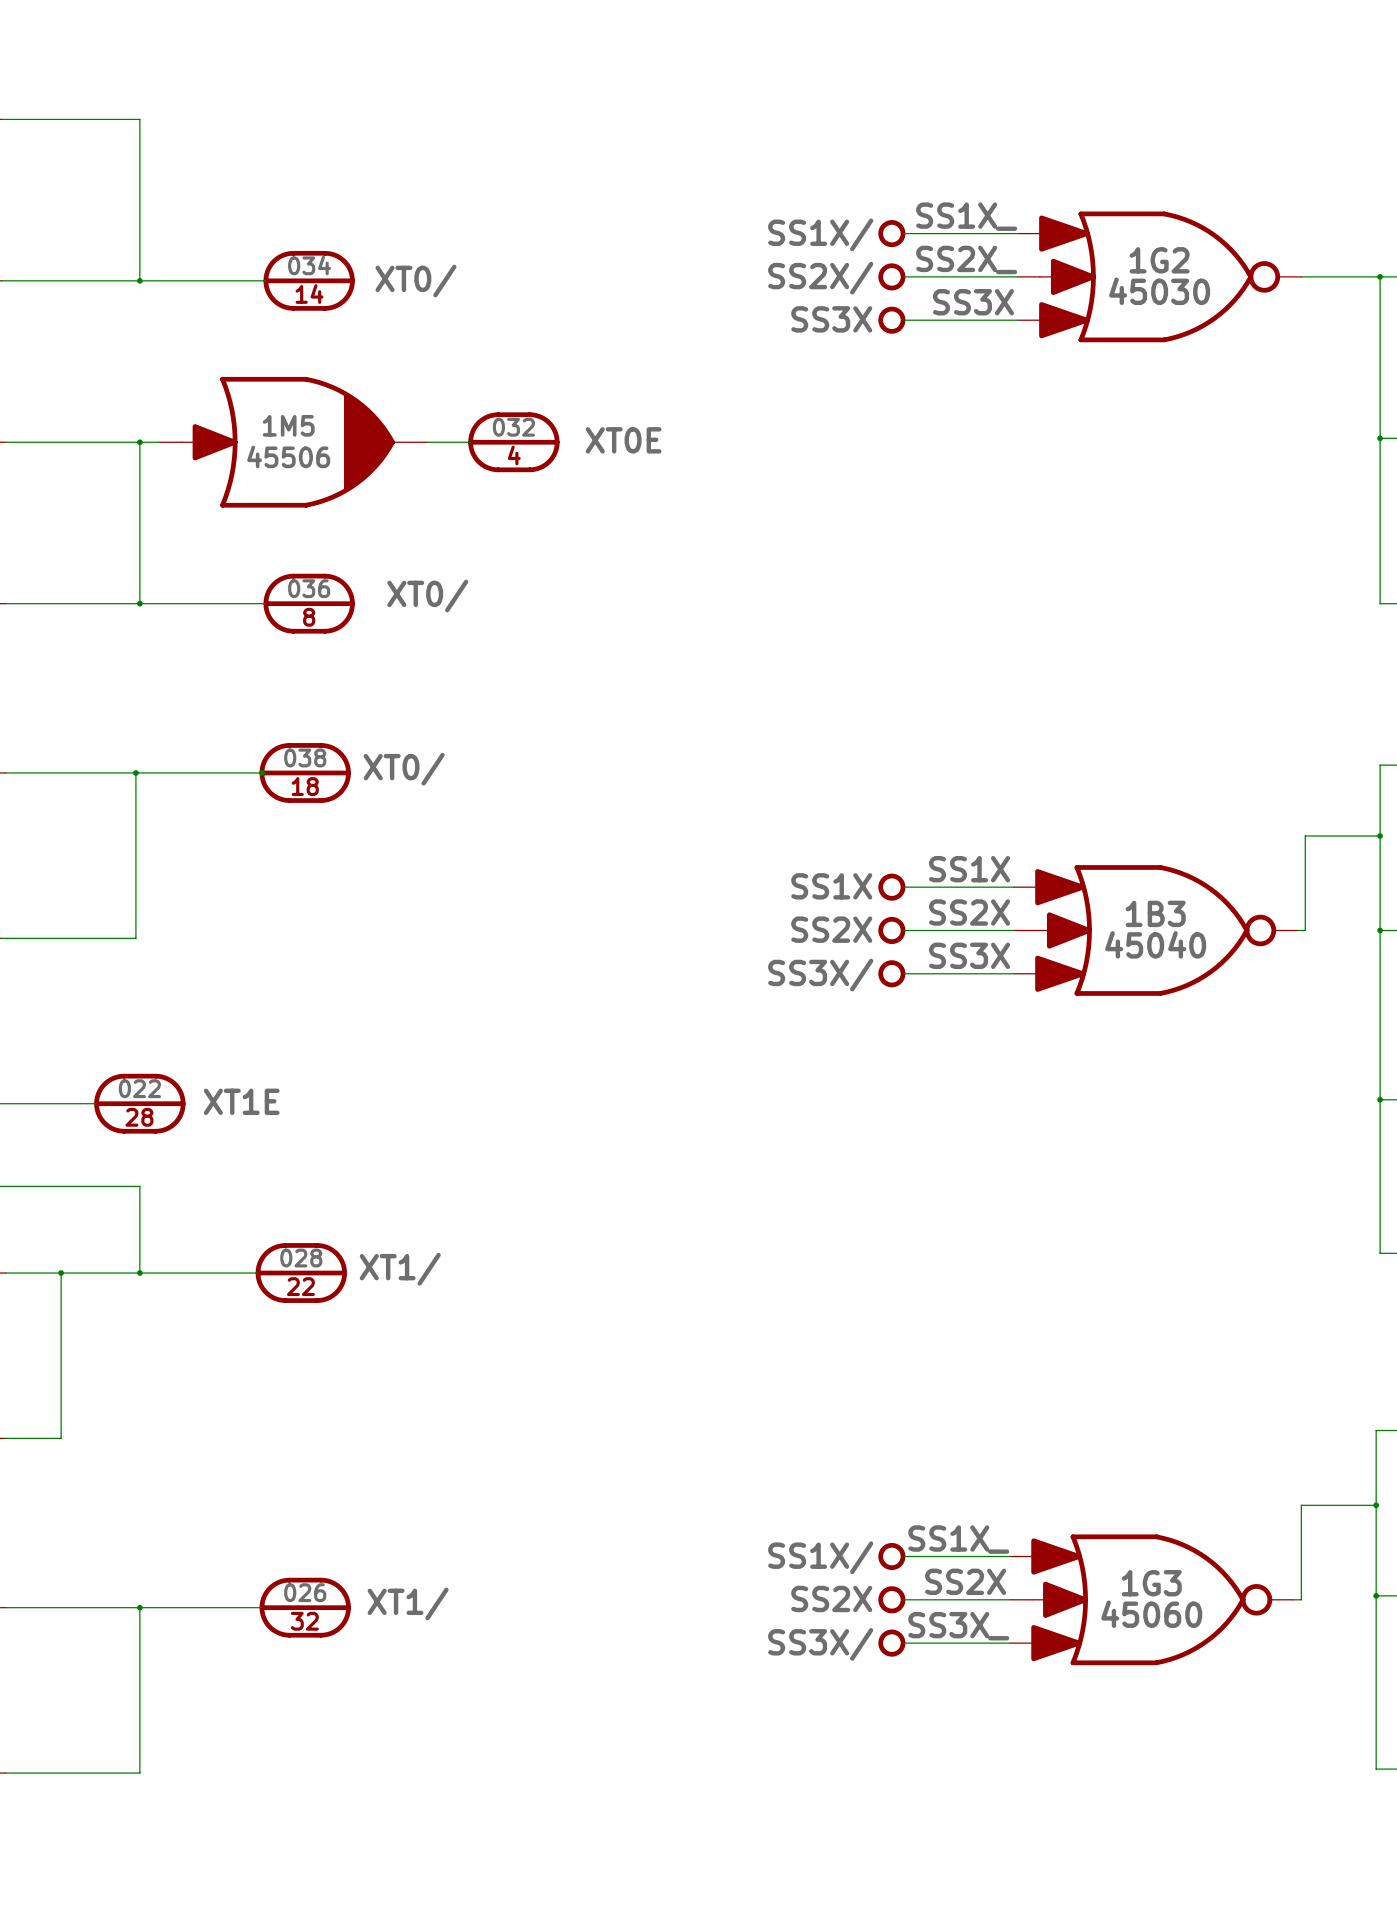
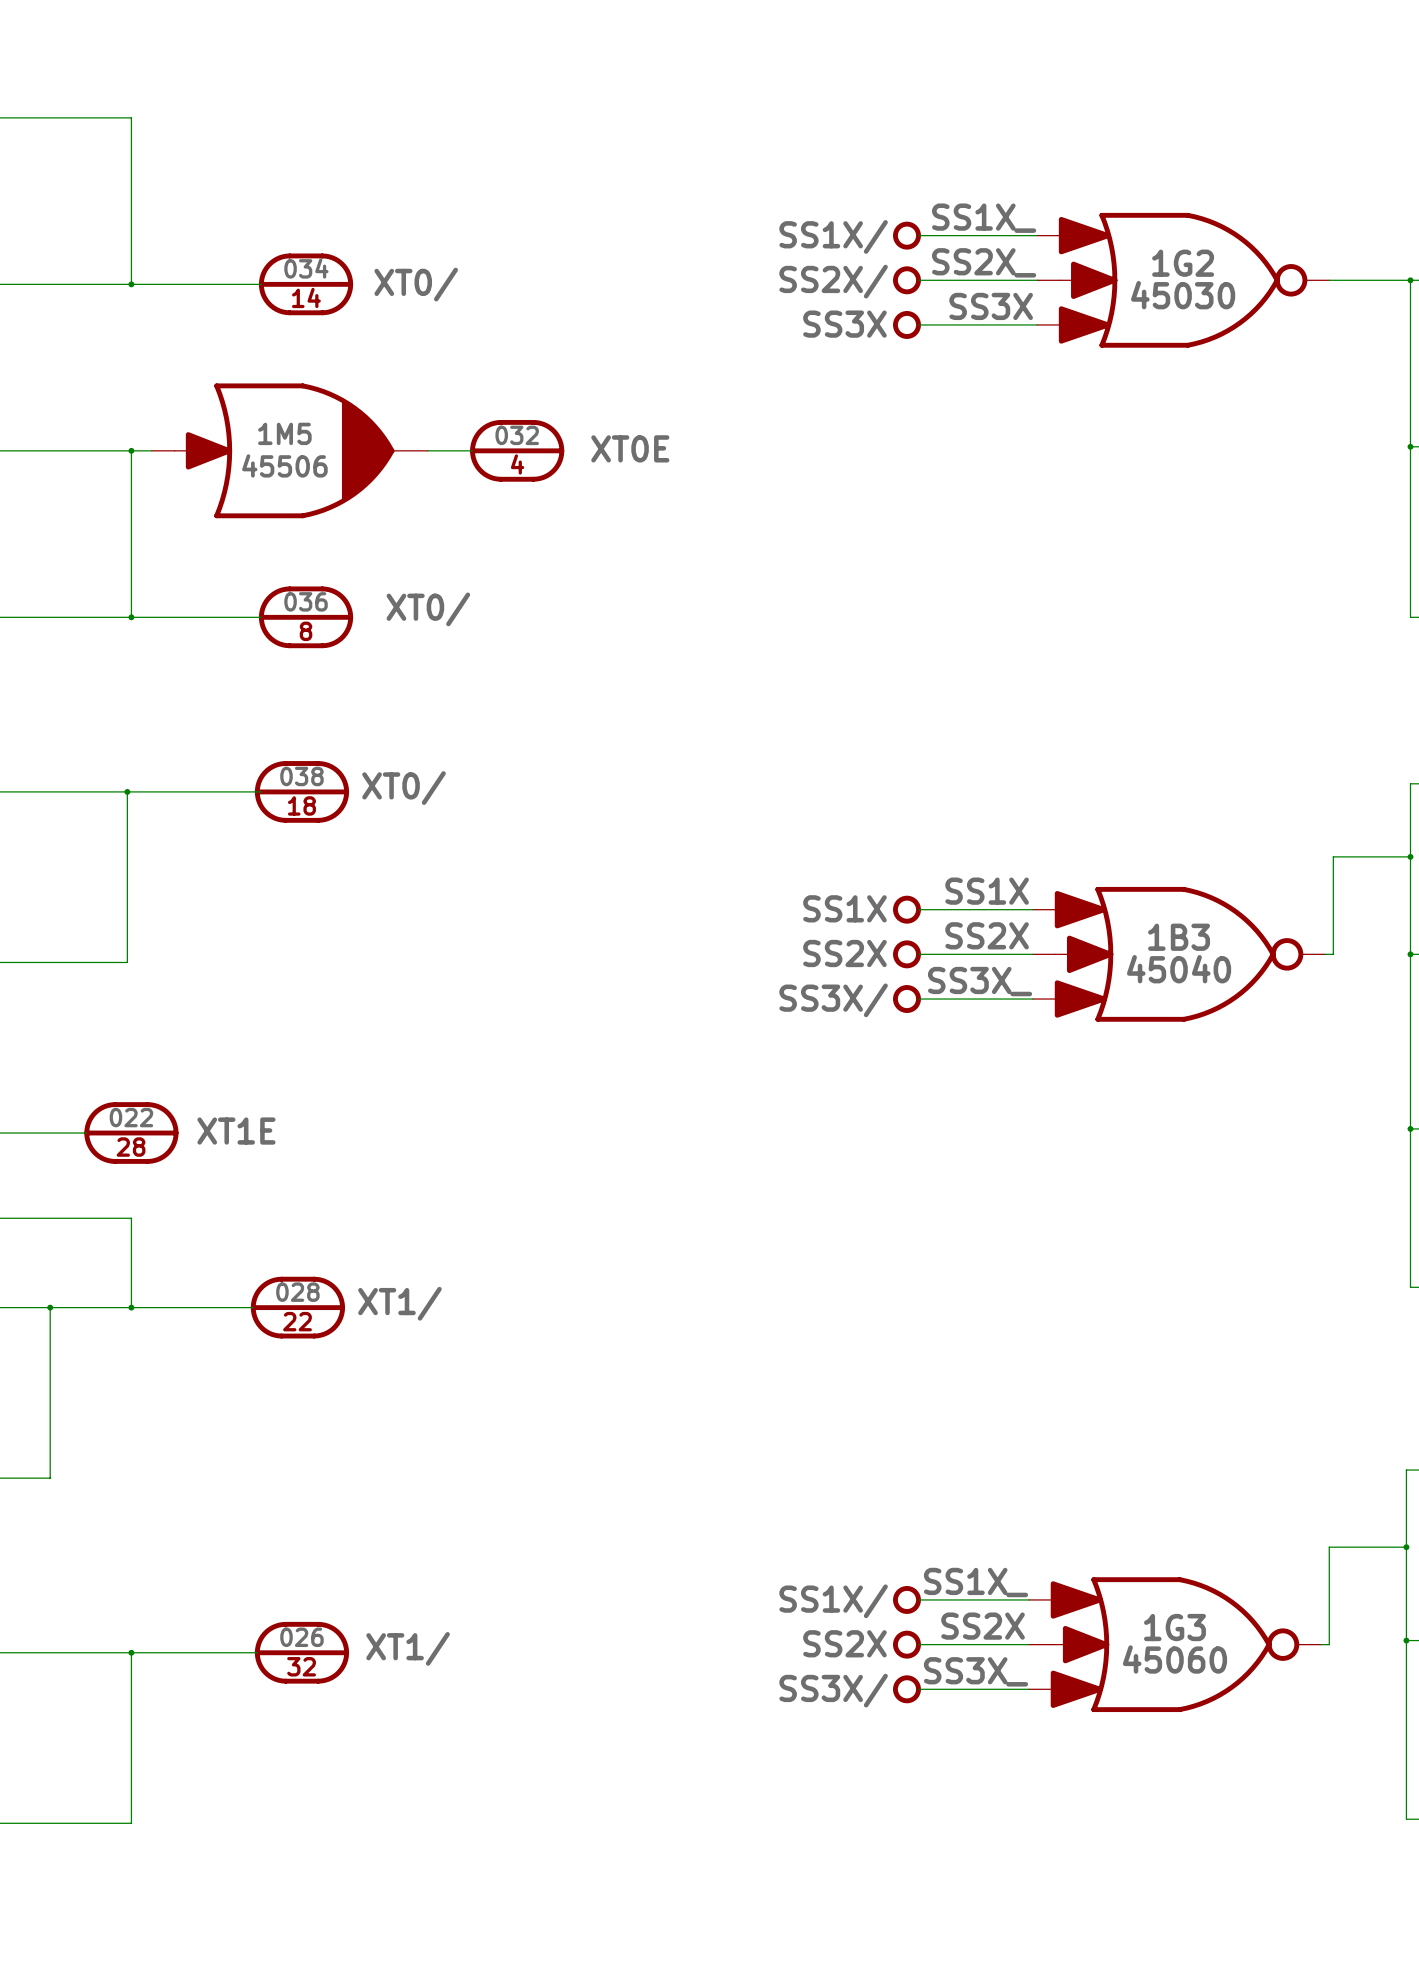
junction: (261, 772) -> none
label: SS3X (969, 955) -> SS3X_ (980, 981)

